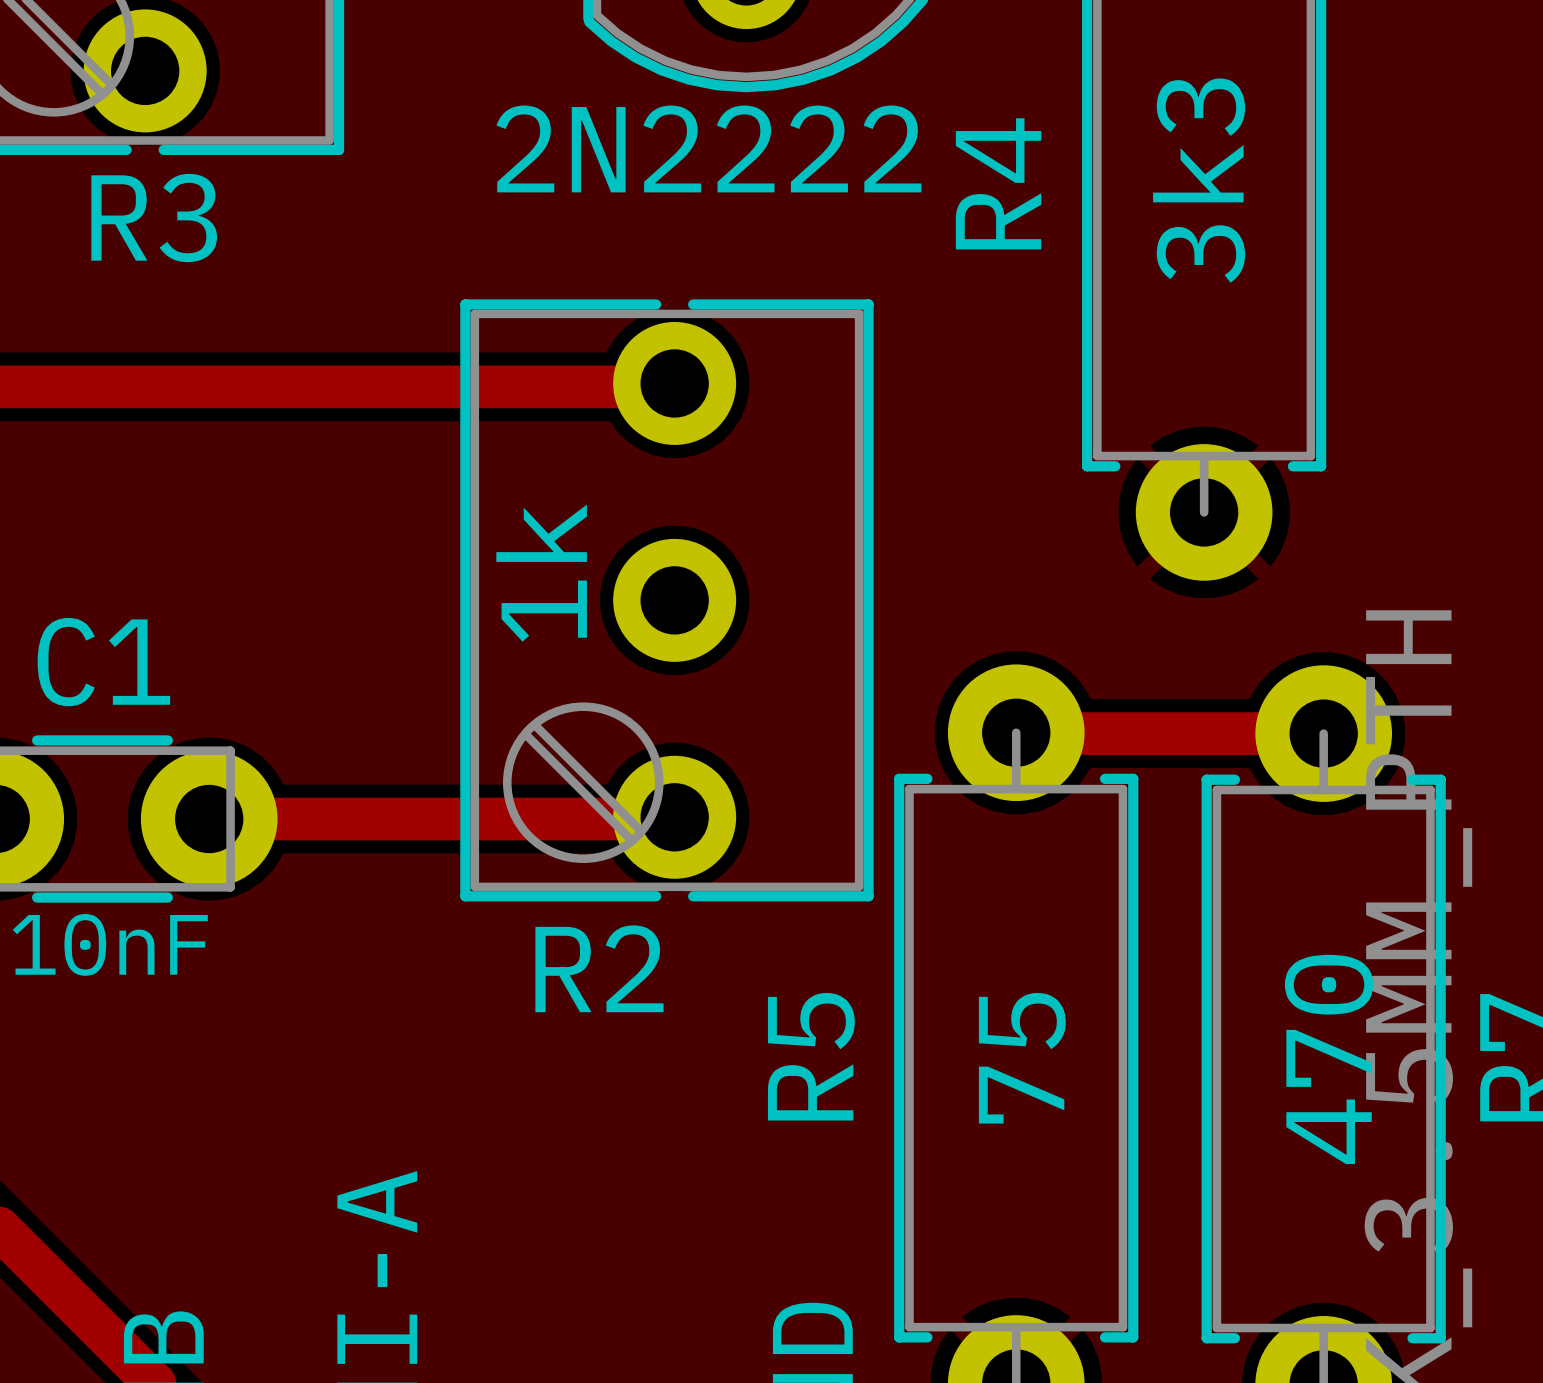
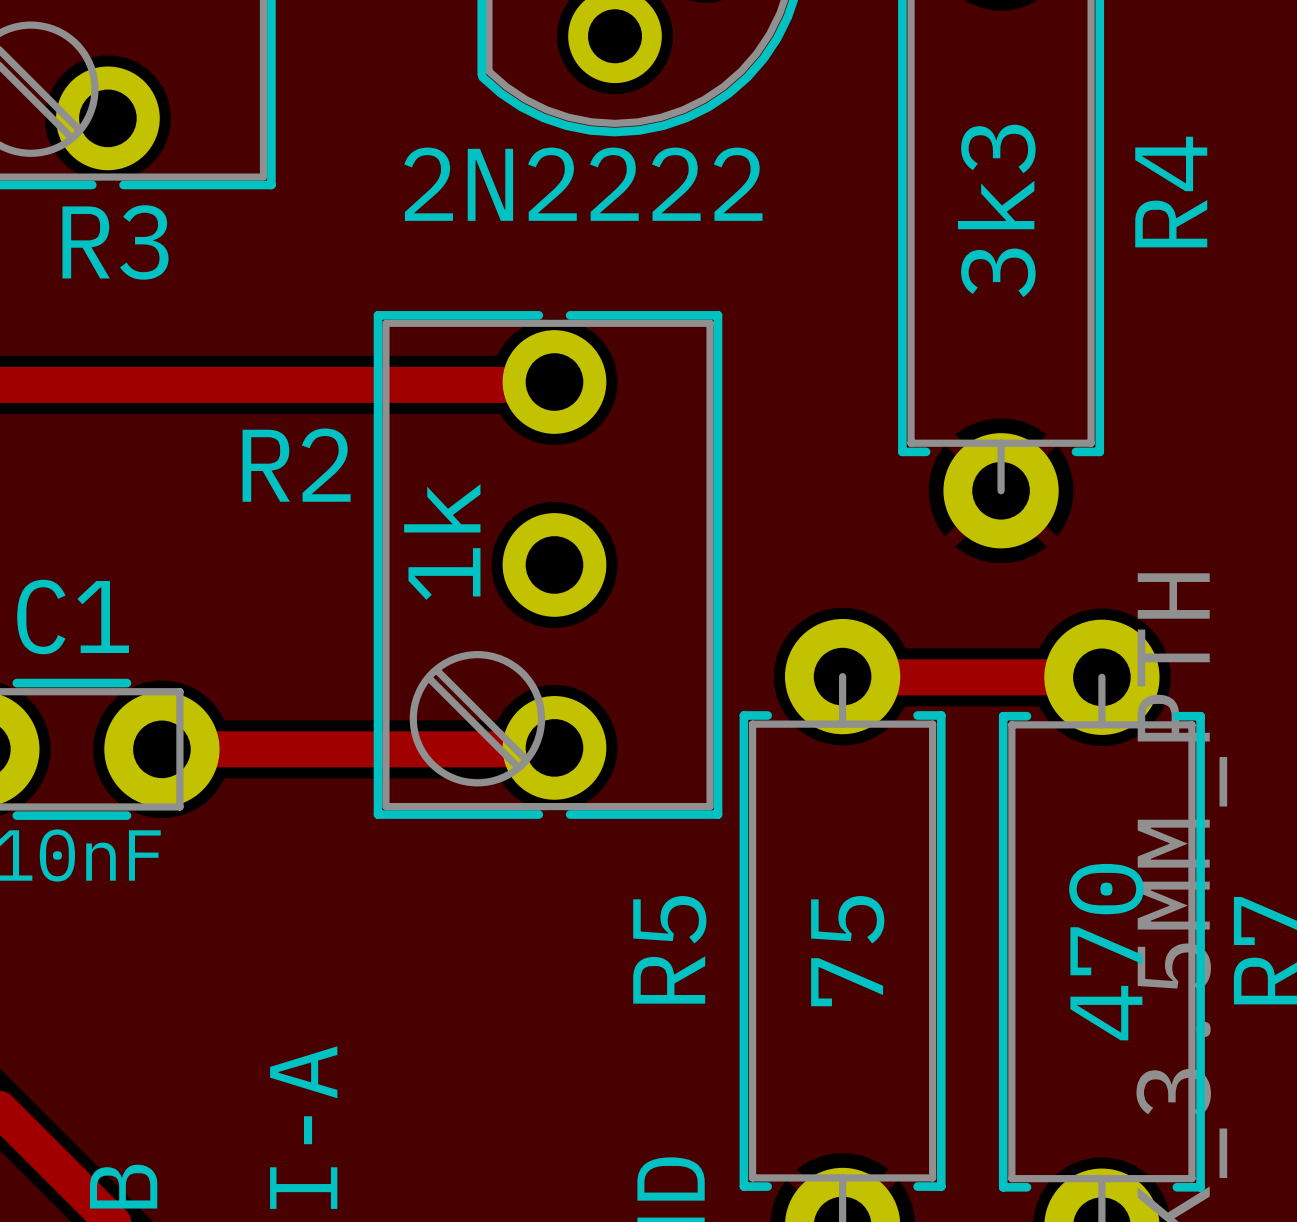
R4 name position: R4 (998, 183) -> R4 (1171, 192)
R2 name position: R2 (599, 968) -> R2 (296, 465)

